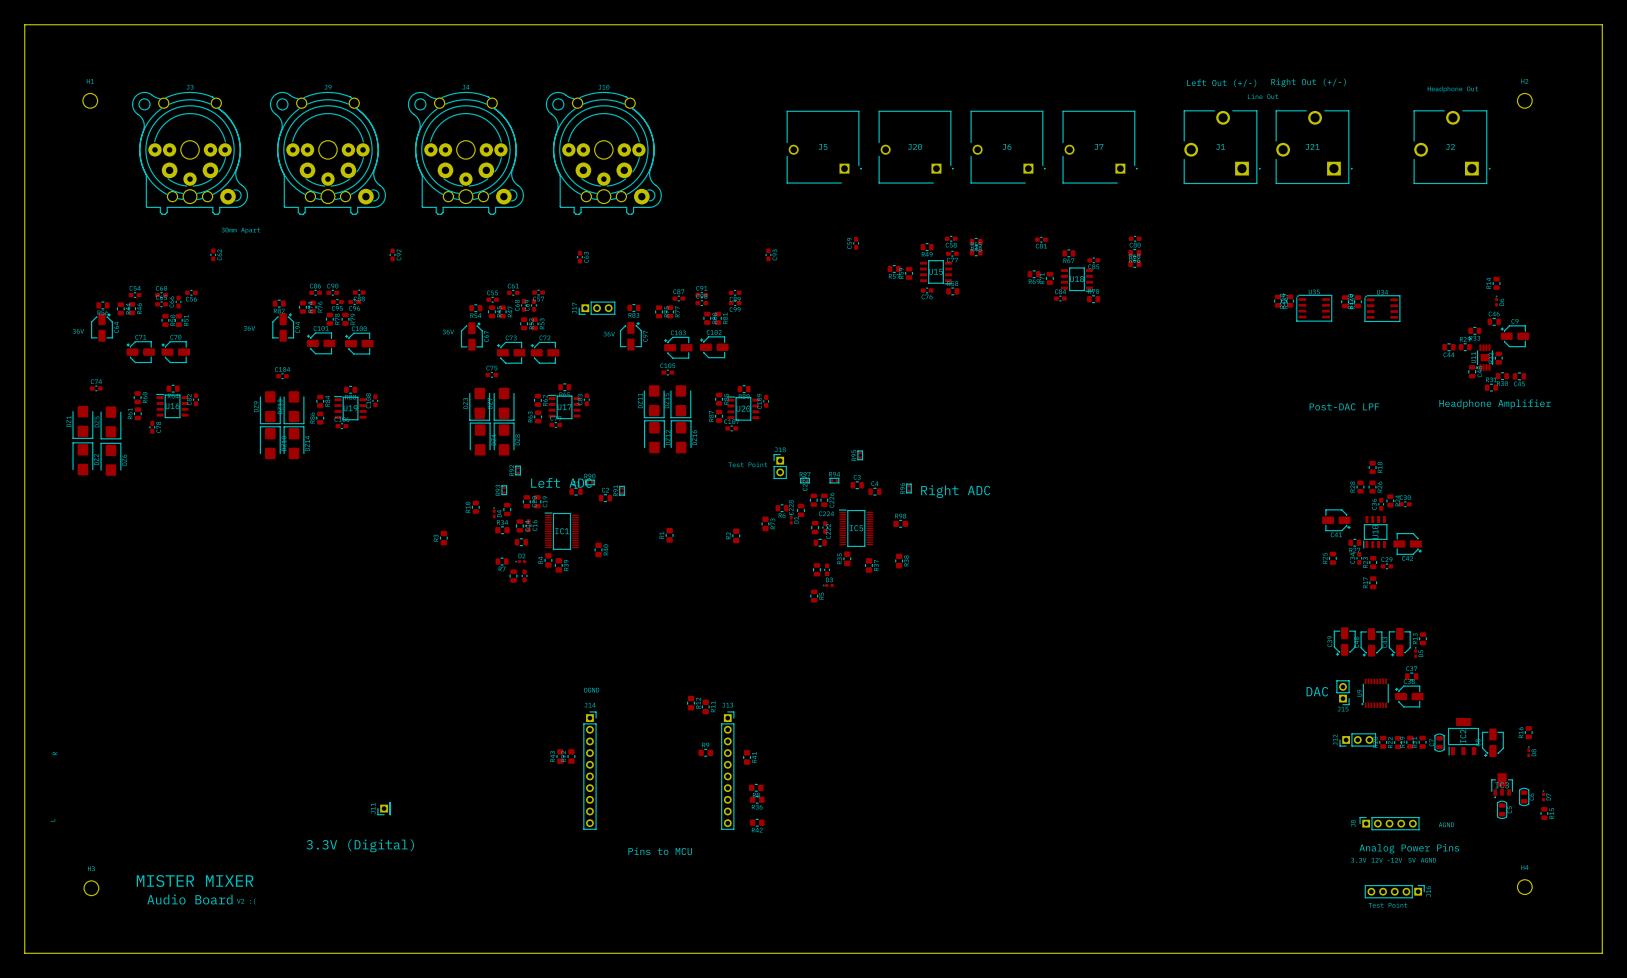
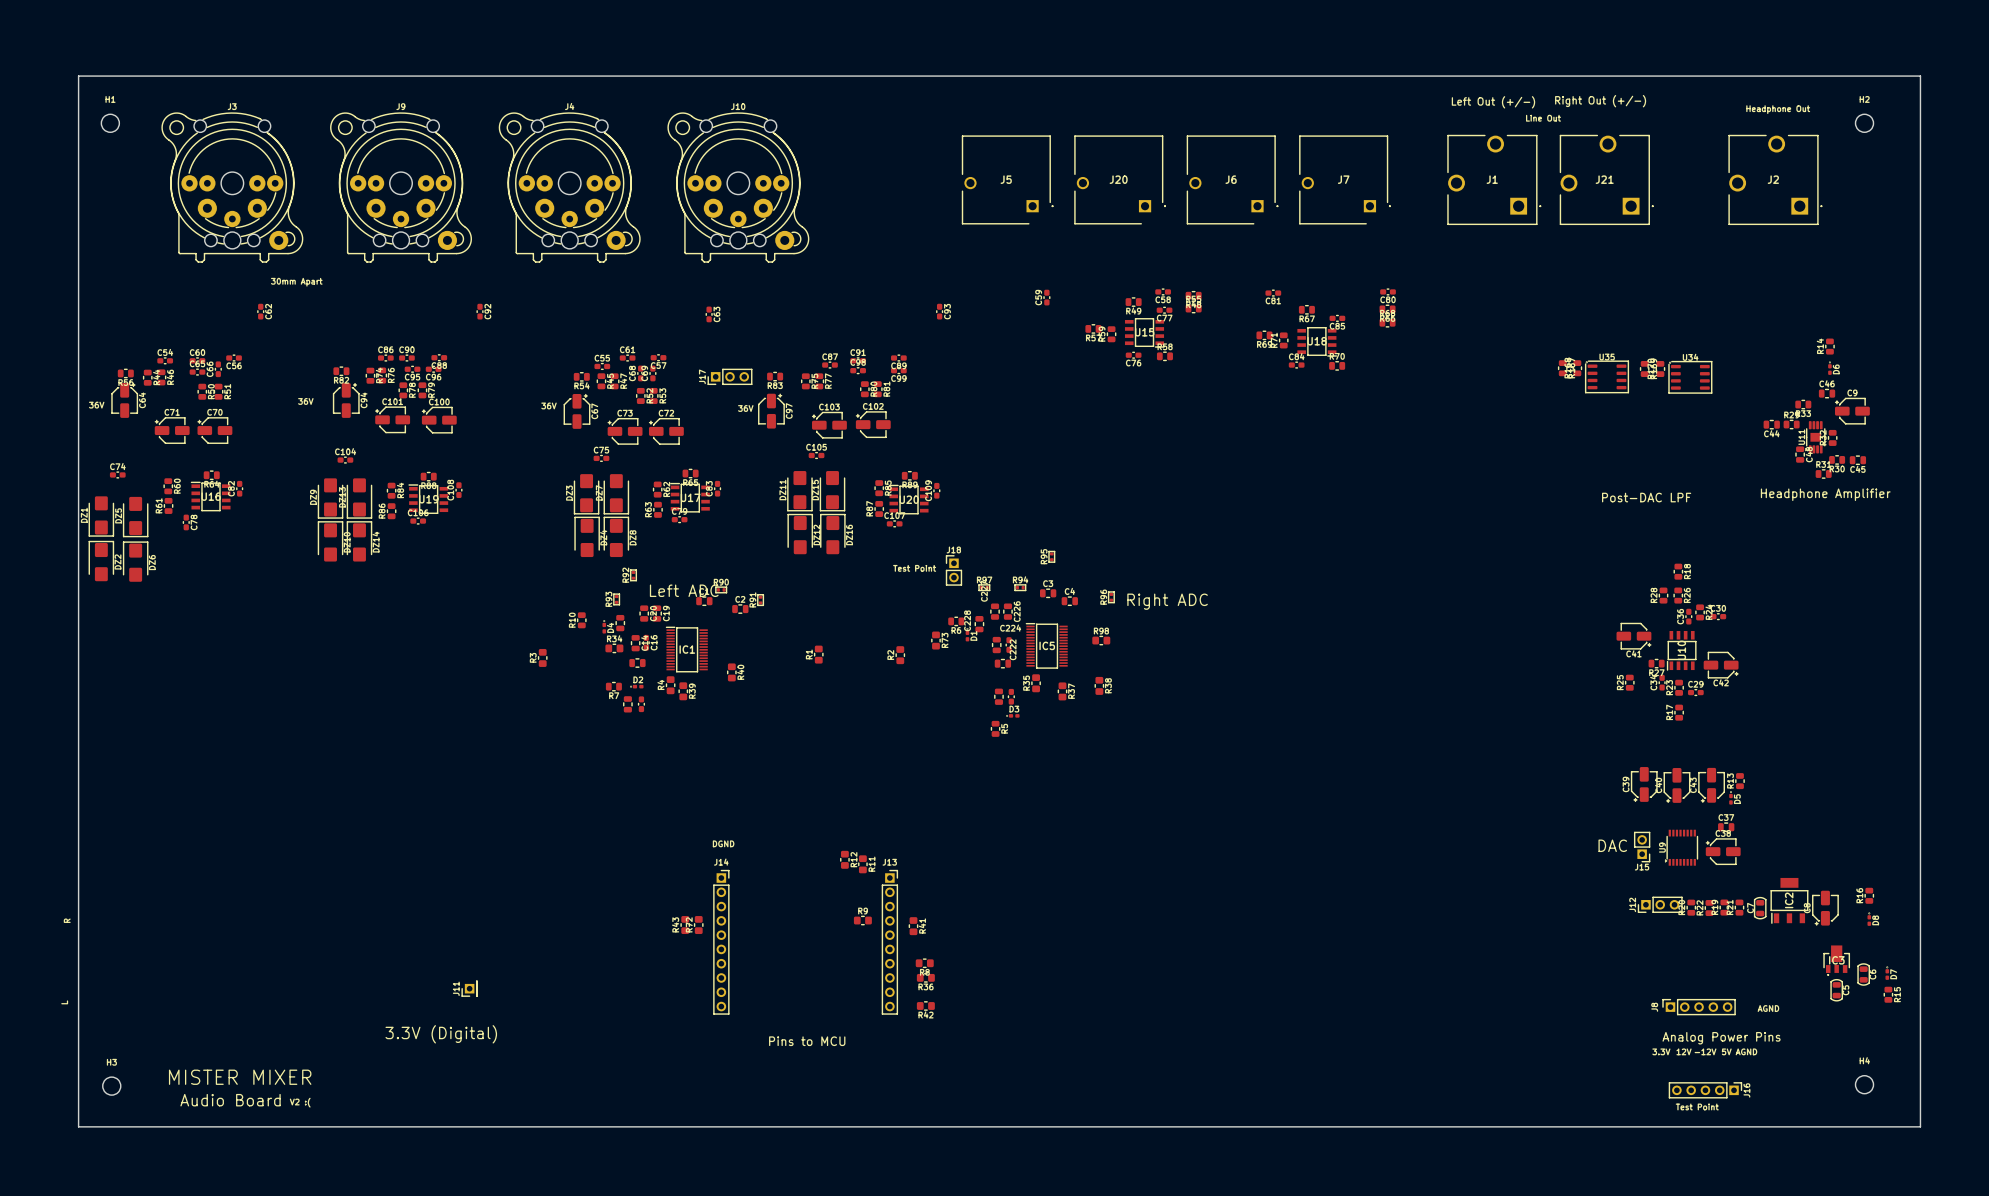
board edge: (24, 24) (1602, 24) (1602, 953) (24, 953) (24, 24) -> (78, 76) (78, 1126) (1920, 1126) (1920, 76) (78, 76)

